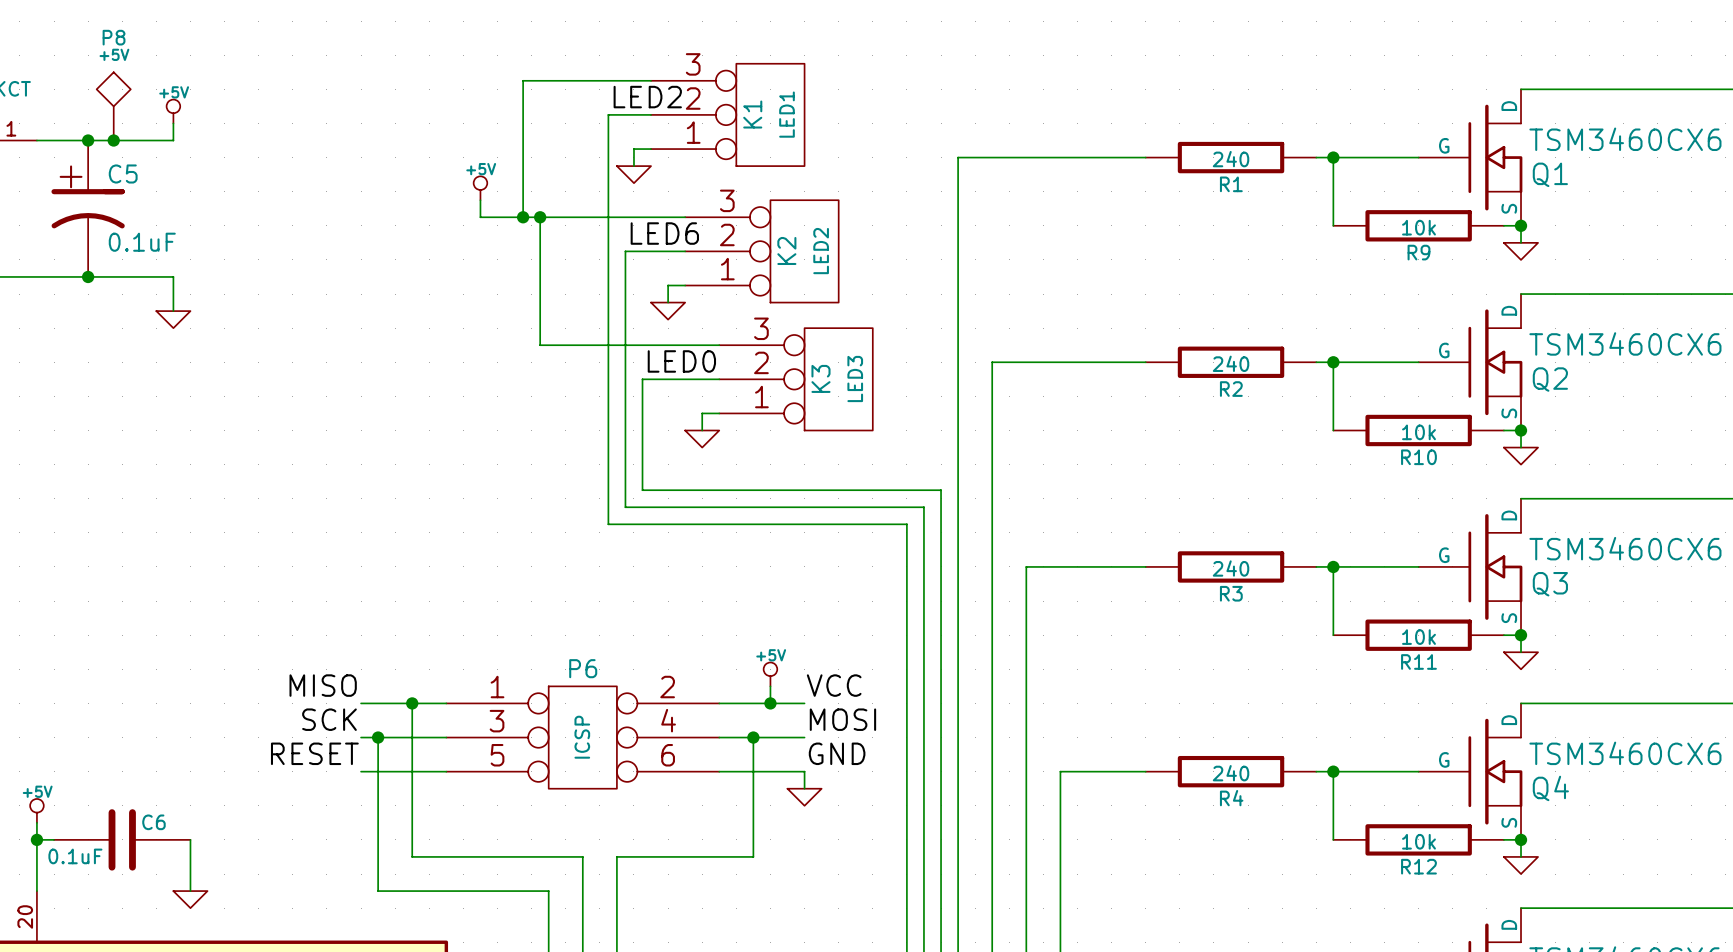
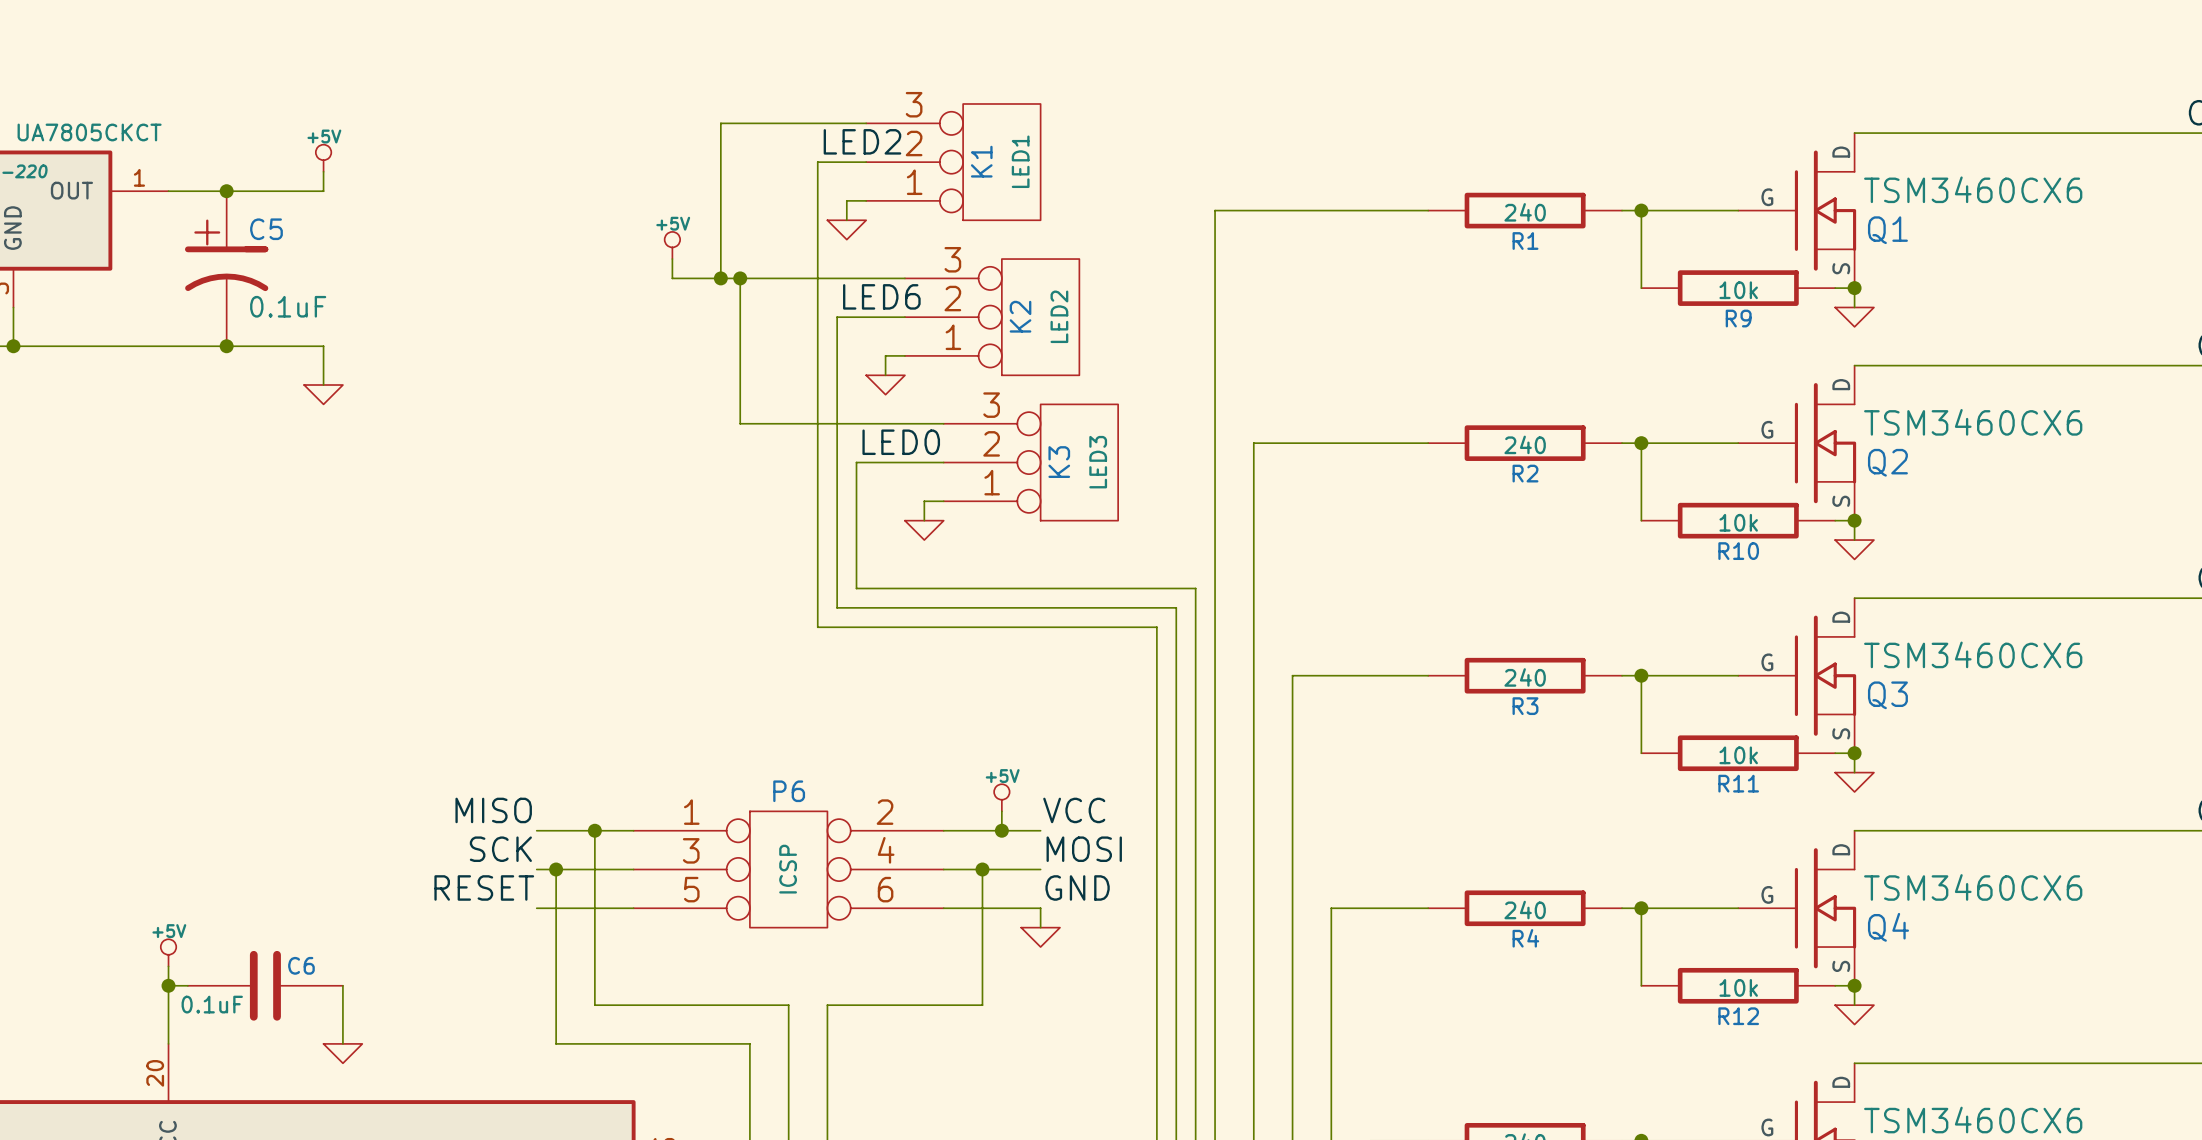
P8: +5V (113, 106) -> none
junction: (113, 140) -> none

